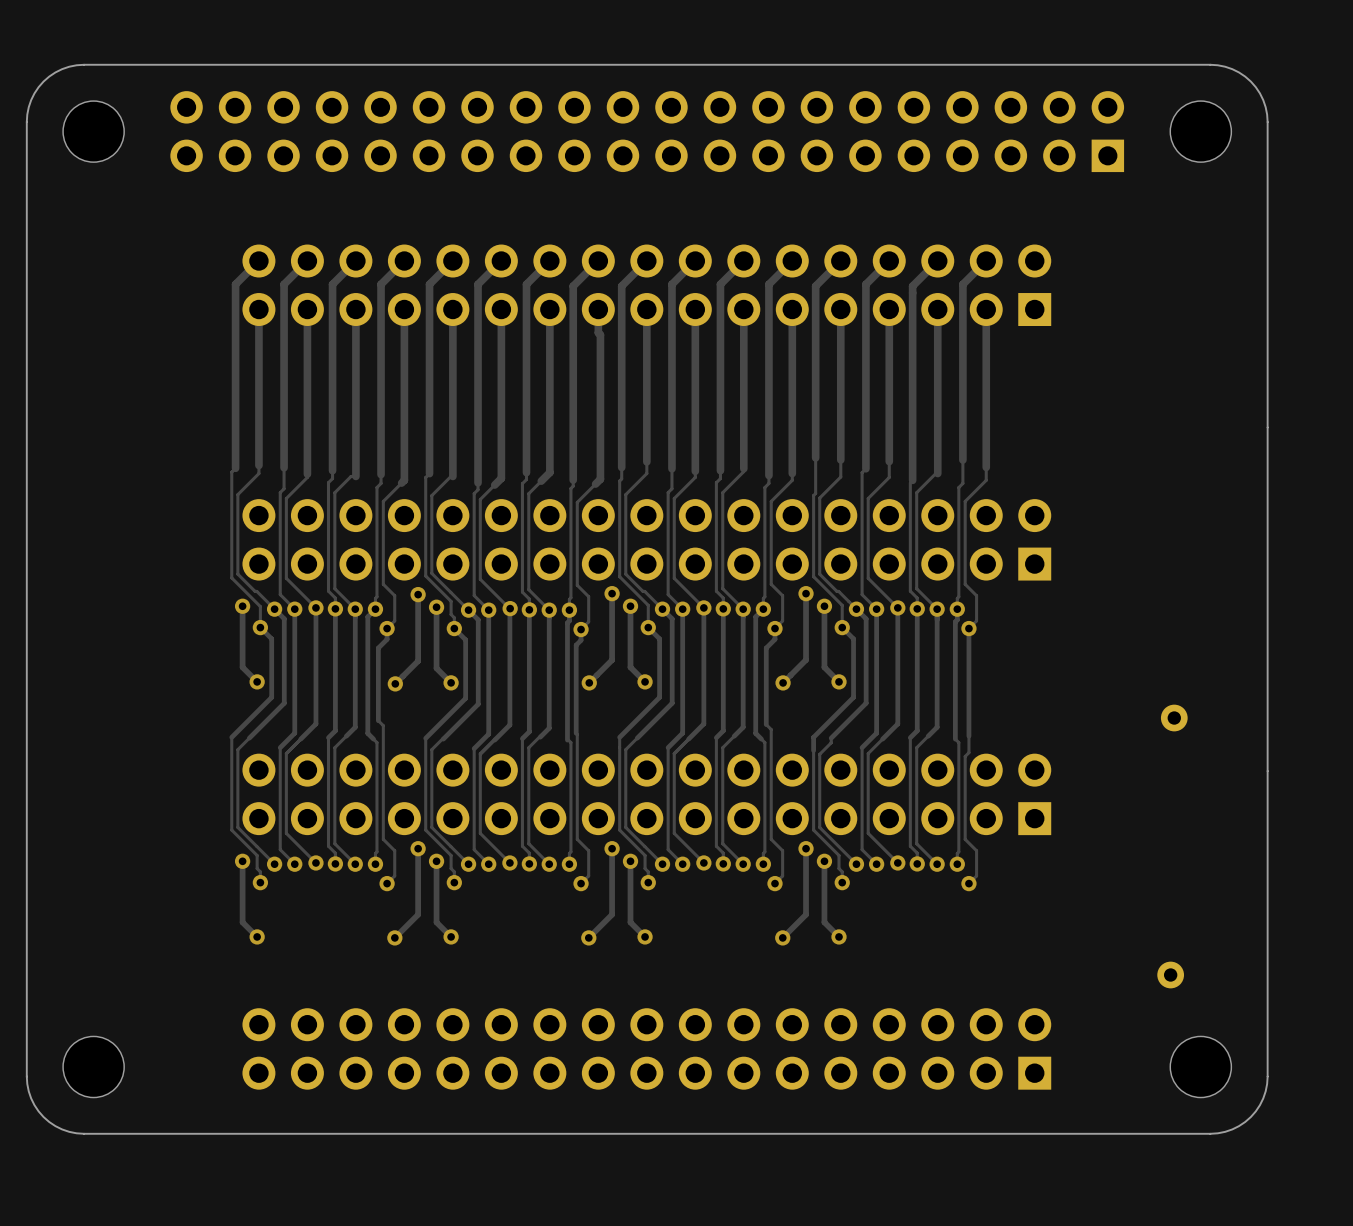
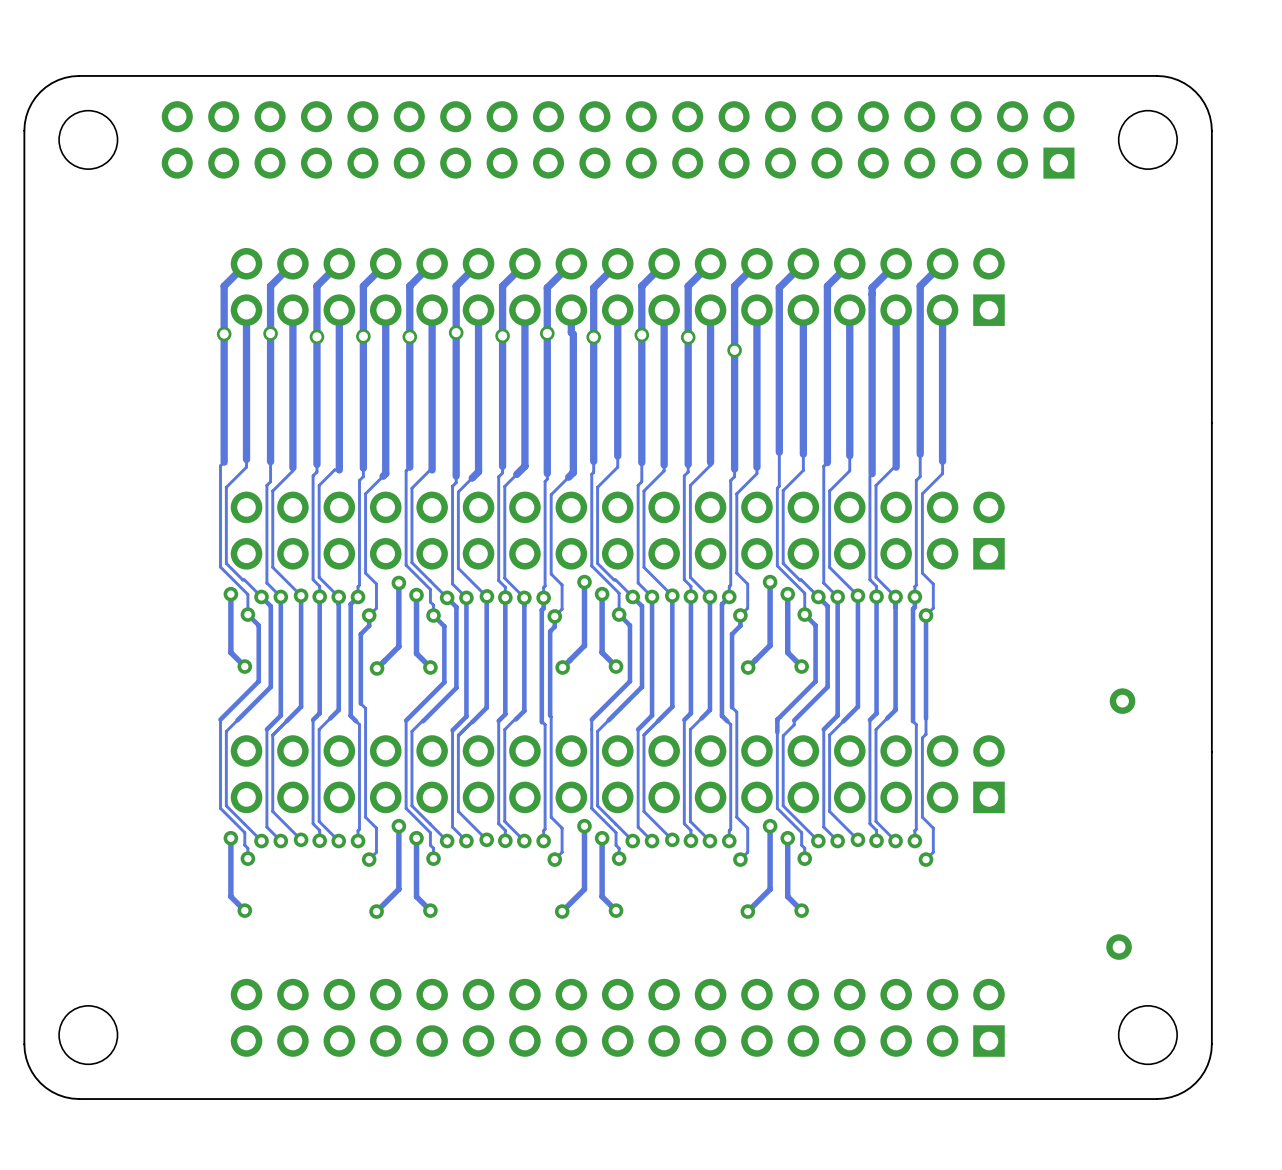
via: none -> (270, 333)
via: none -> (456, 332)
via: none -> (547, 333)
via: none -> (224, 334)
via: none -> (641, 335)
via: none -> (363, 336)
via: none -> (502, 335)
via: none -> (316, 336)
via: none -> (409, 336)
via: none -> (593, 337)
via: none -> (688, 337)
via: none -> (734, 350)

